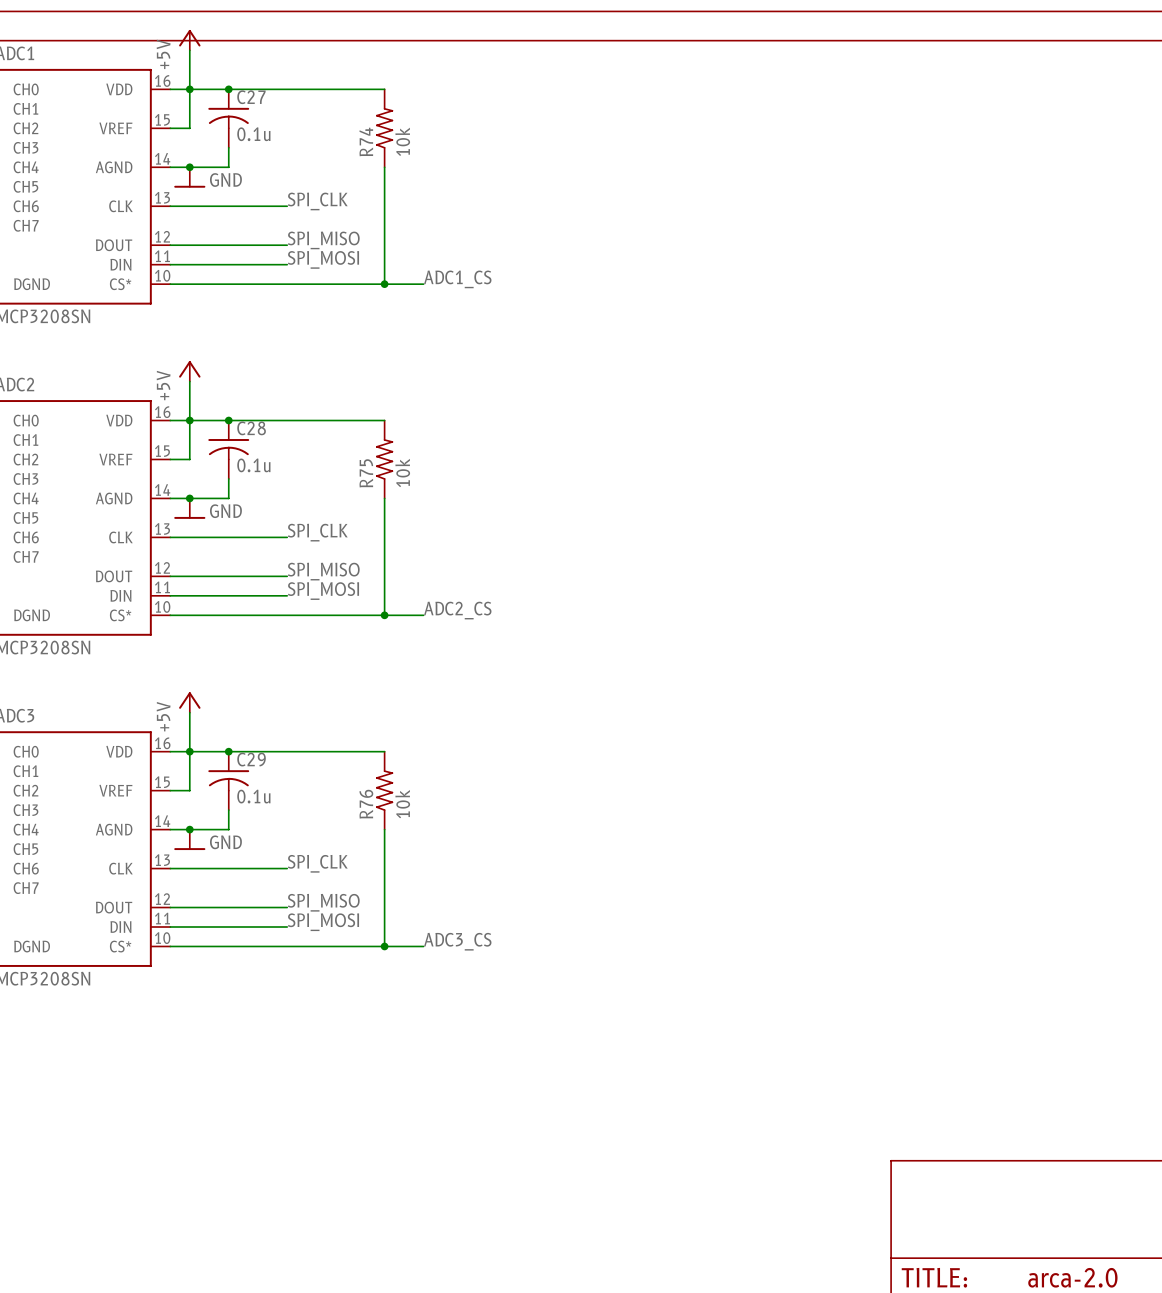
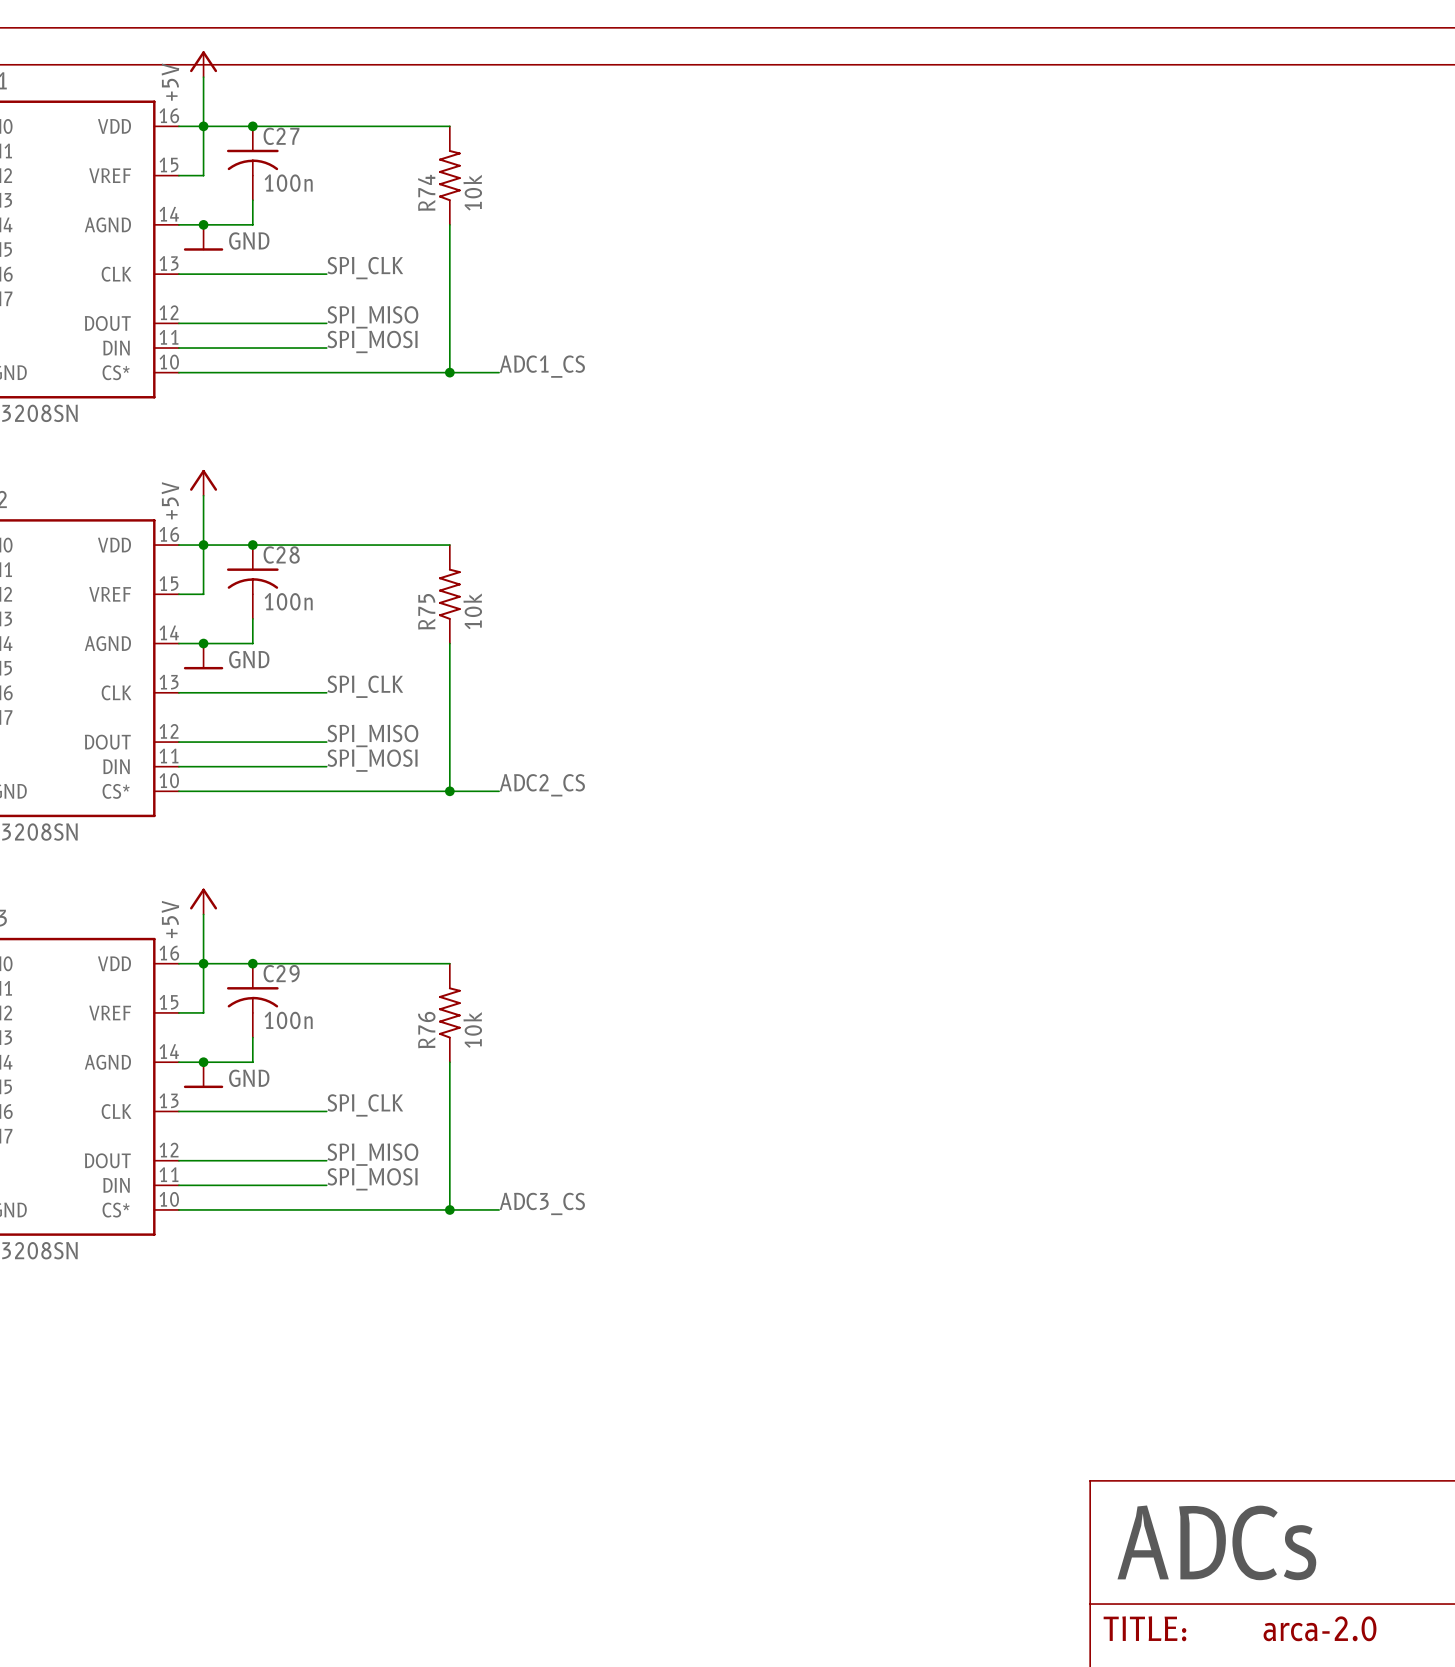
C27 value: 0.1u (253, 134) -> 100n (288, 183)
C28 value: 0.1u (253, 465) -> 100n (288, 601)
C29 value: 0.1u (253, 796) -> 100n (288, 1020)
text: none -> ADCs (1216, 1542)

